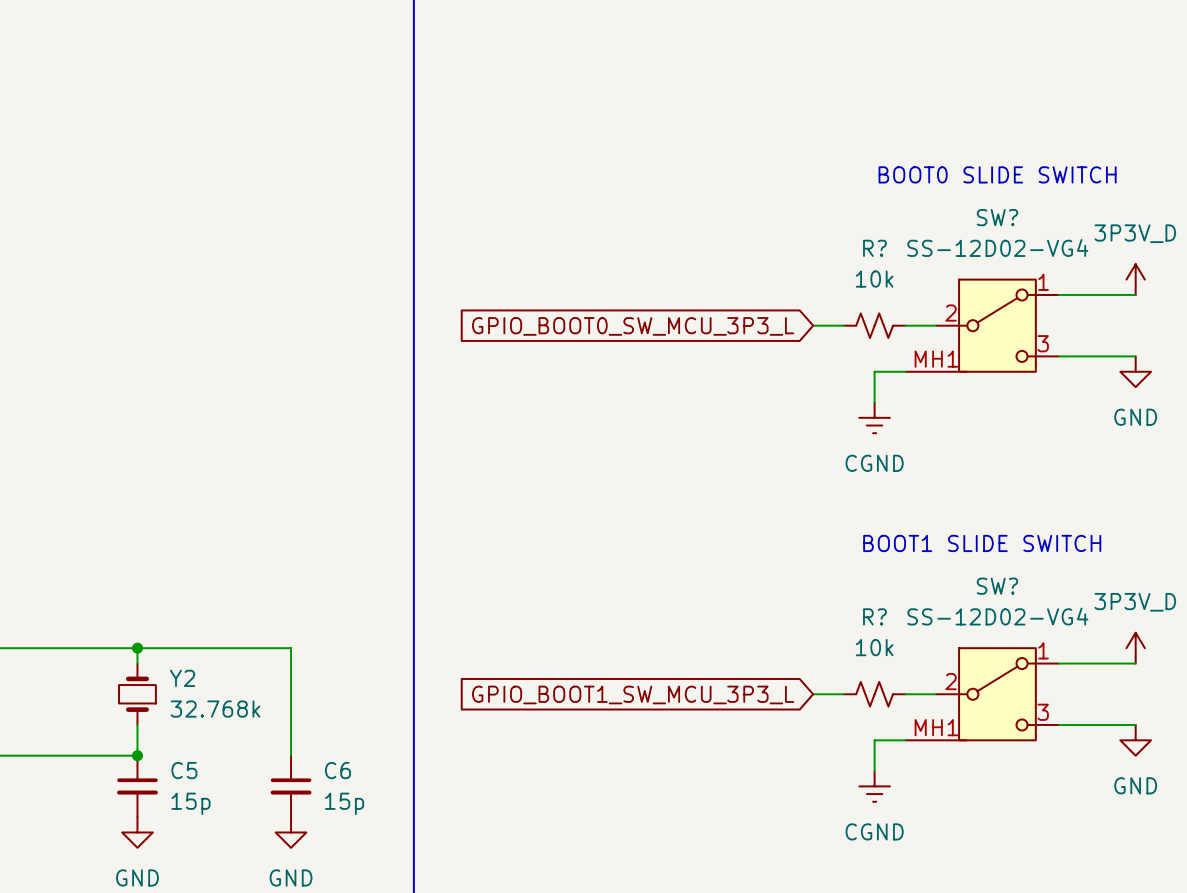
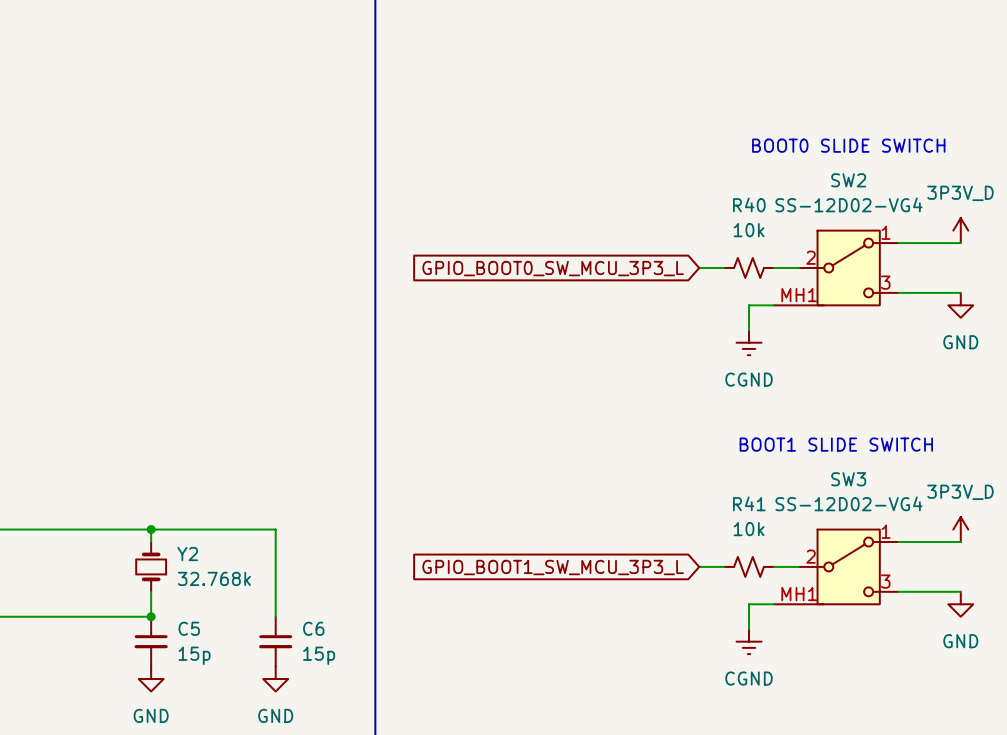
SW? name: SW? (997, 217) -> SW2 (848, 180)
R? name: R? (874, 248) -> R40 (749, 204)
SW? name: SW? (997, 586) -> SW3 (848, 479)
R? name: R? (874, 616) -> R41 (749, 503)

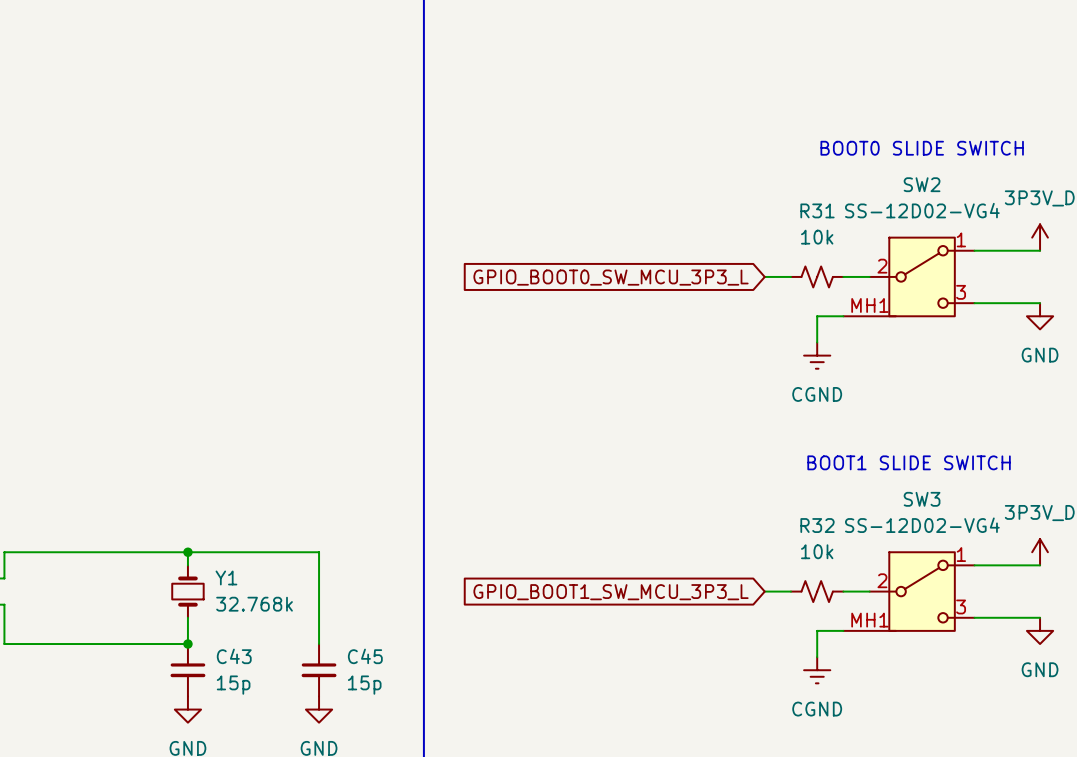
R40 name: R40 (749, 204) -> R31 (817, 210)
R41 name: R41 (749, 503) -> R32 (817, 525)
Y2 name: Y2 (187, 554) -> Y1 (226, 577)
C5 name: C5 (189, 628) -> C43 (234, 656)
C6 name: C6 (313, 628) -> C45 (365, 656)

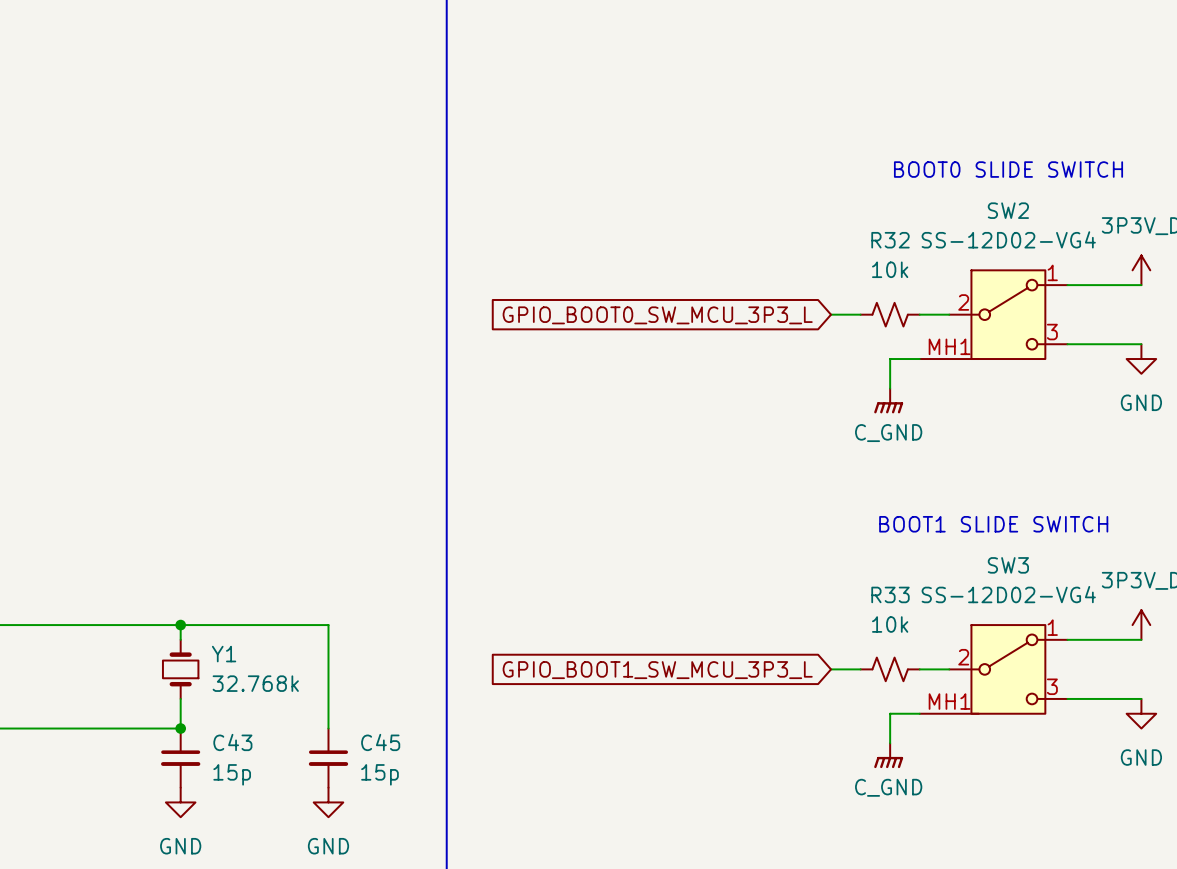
R31 name: R31 (817, 210) -> R32 (890, 240)
power symbol: CGND (817, 355) -> C_GND (888, 400)
R32 name: R32 (817, 525) -> R33 (890, 594)
power symbol: CGND (817, 670) -> C_GND (888, 755)

